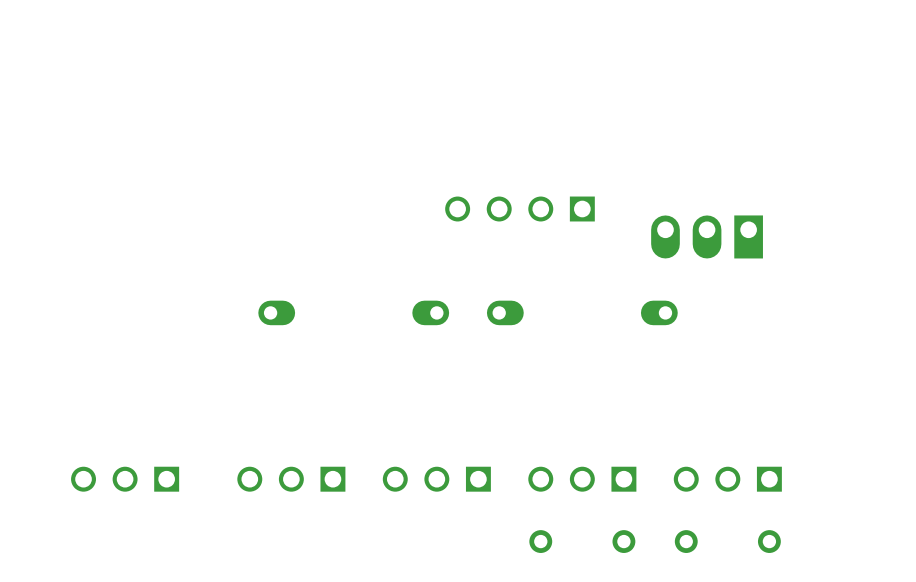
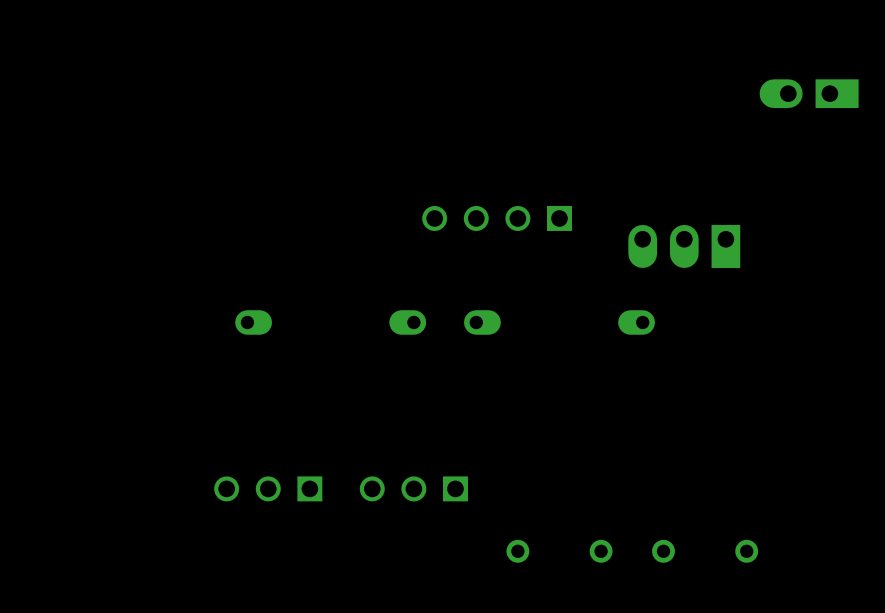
part: none -> (809, 93)
part: (125, 479) -> none
part: (582, 479) -> none
part: (727, 479) -> none

